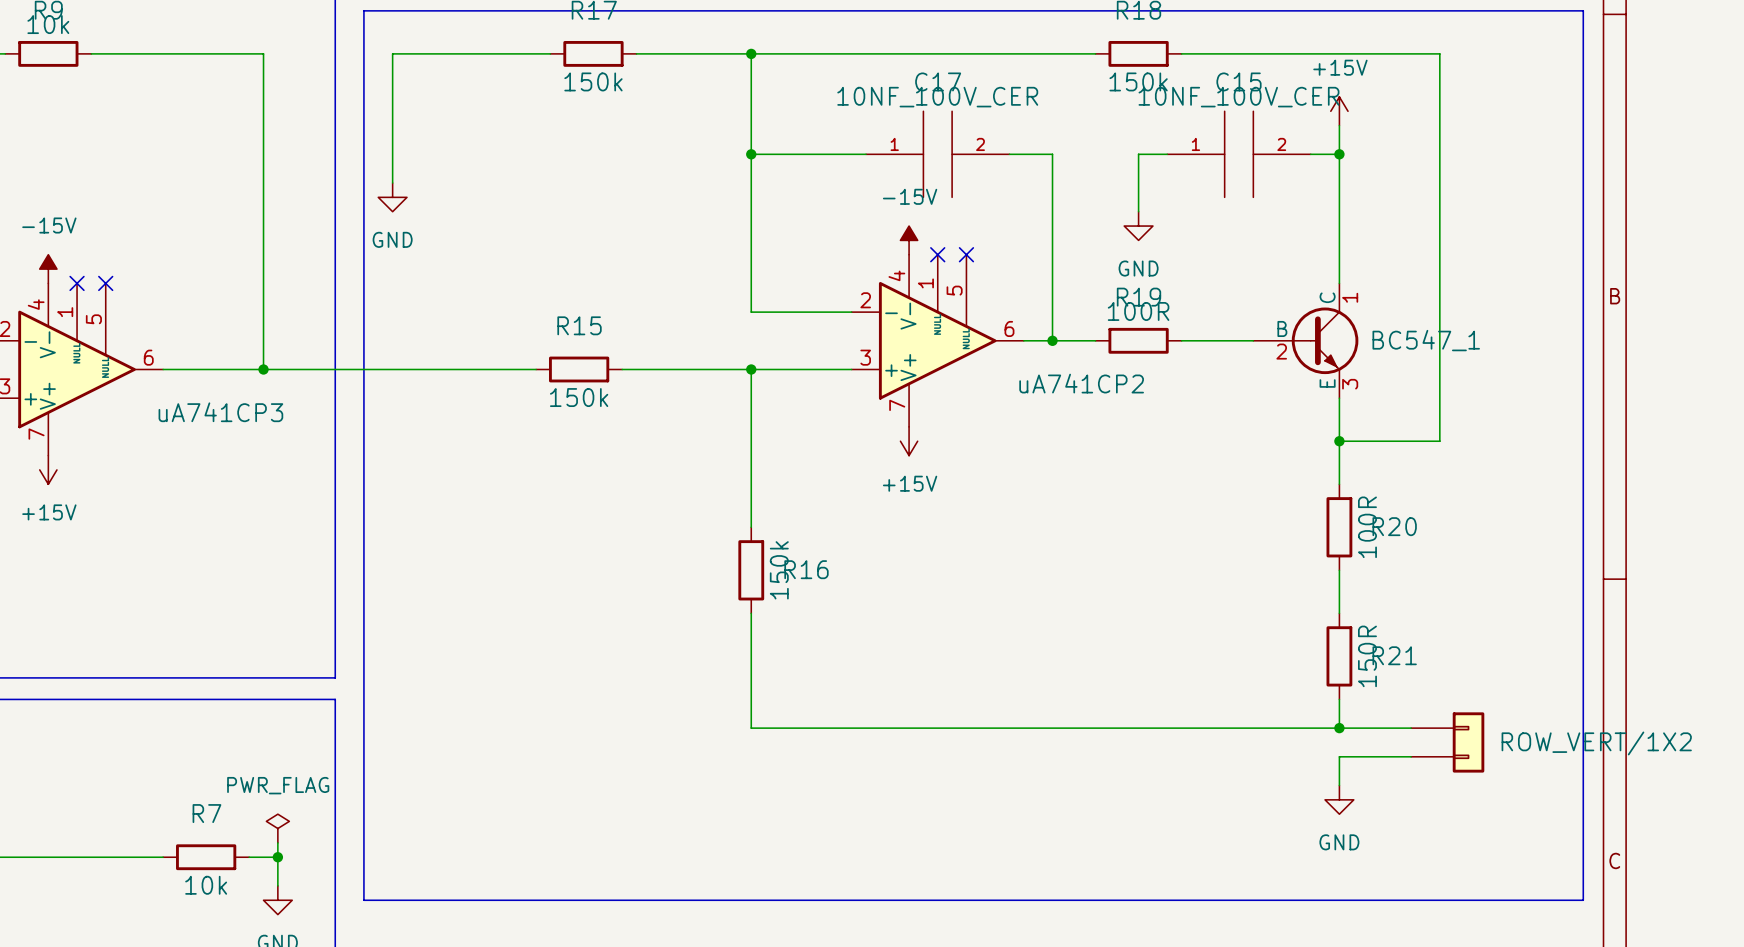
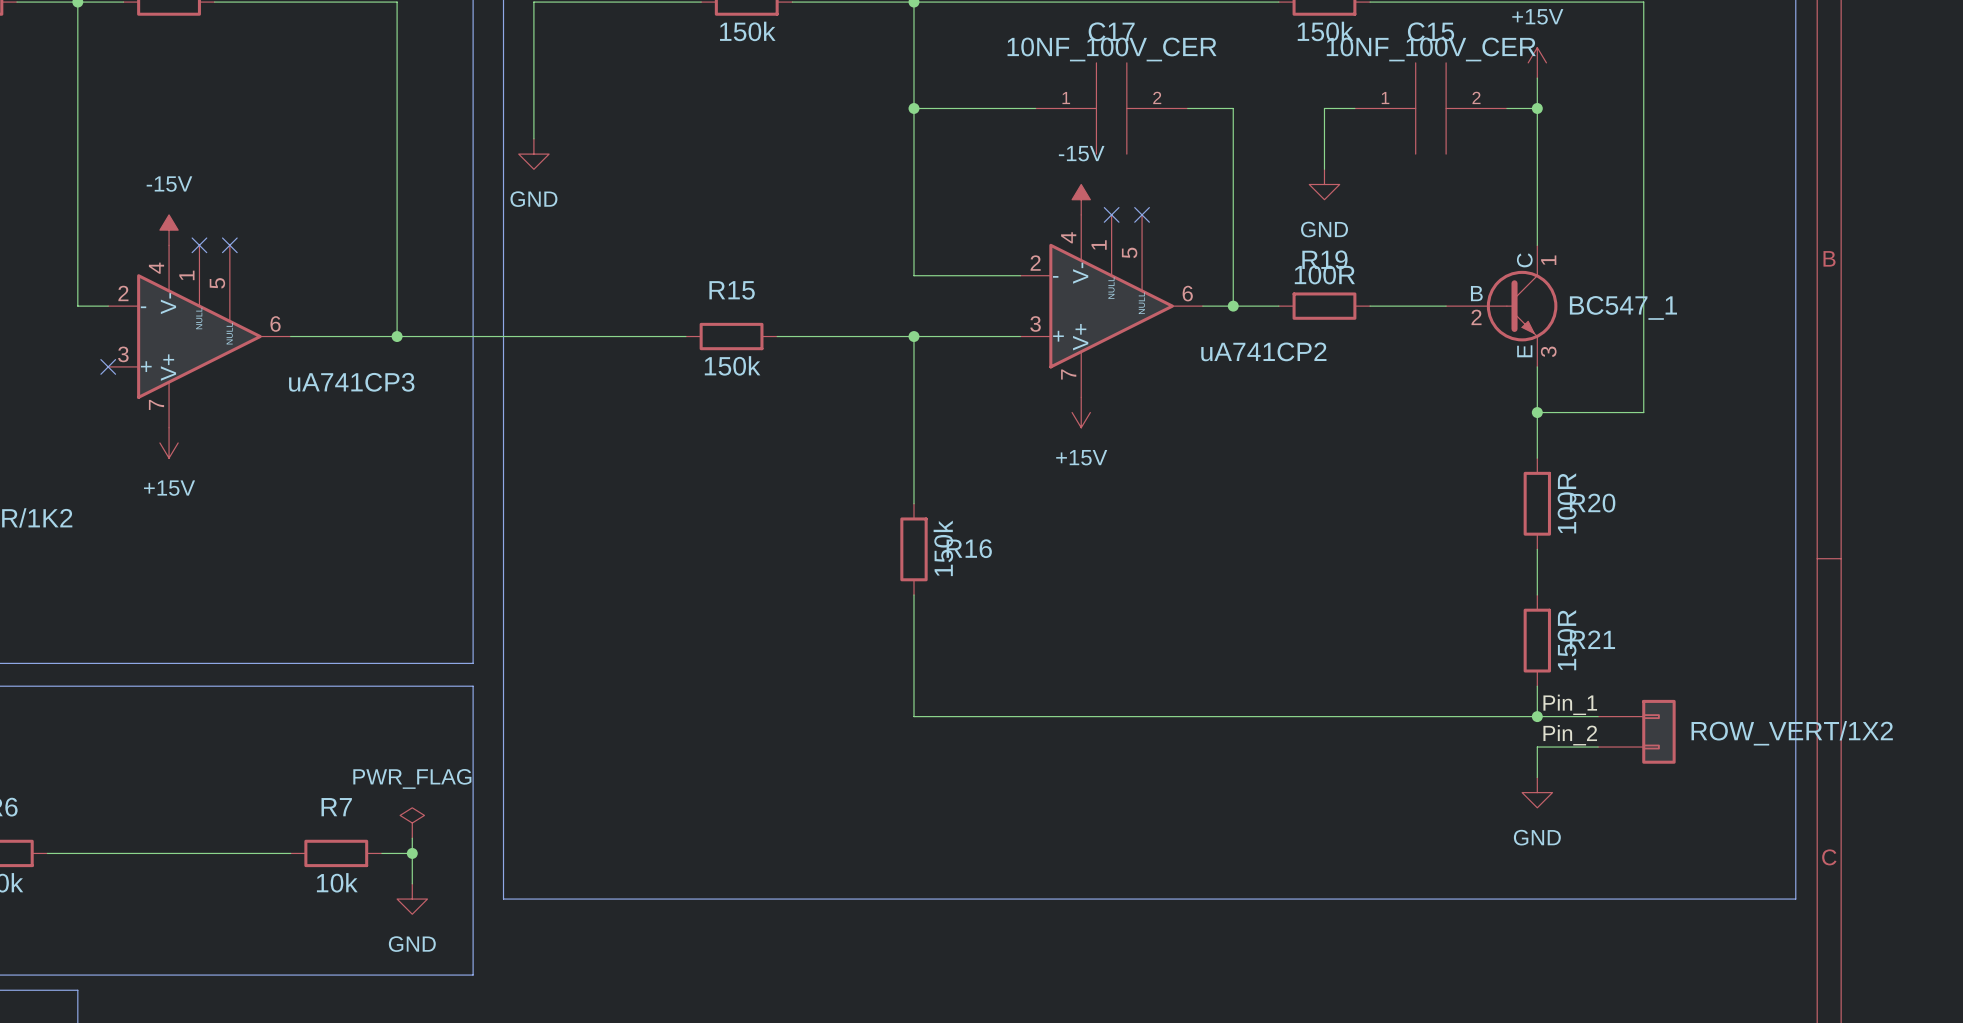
label: none -> Pin_1 (1570, 704)
ROW_VERT/1X2 position: (1447, 742) -> (1636, 731)
label: none -> Pin_2 (1570, 735)

